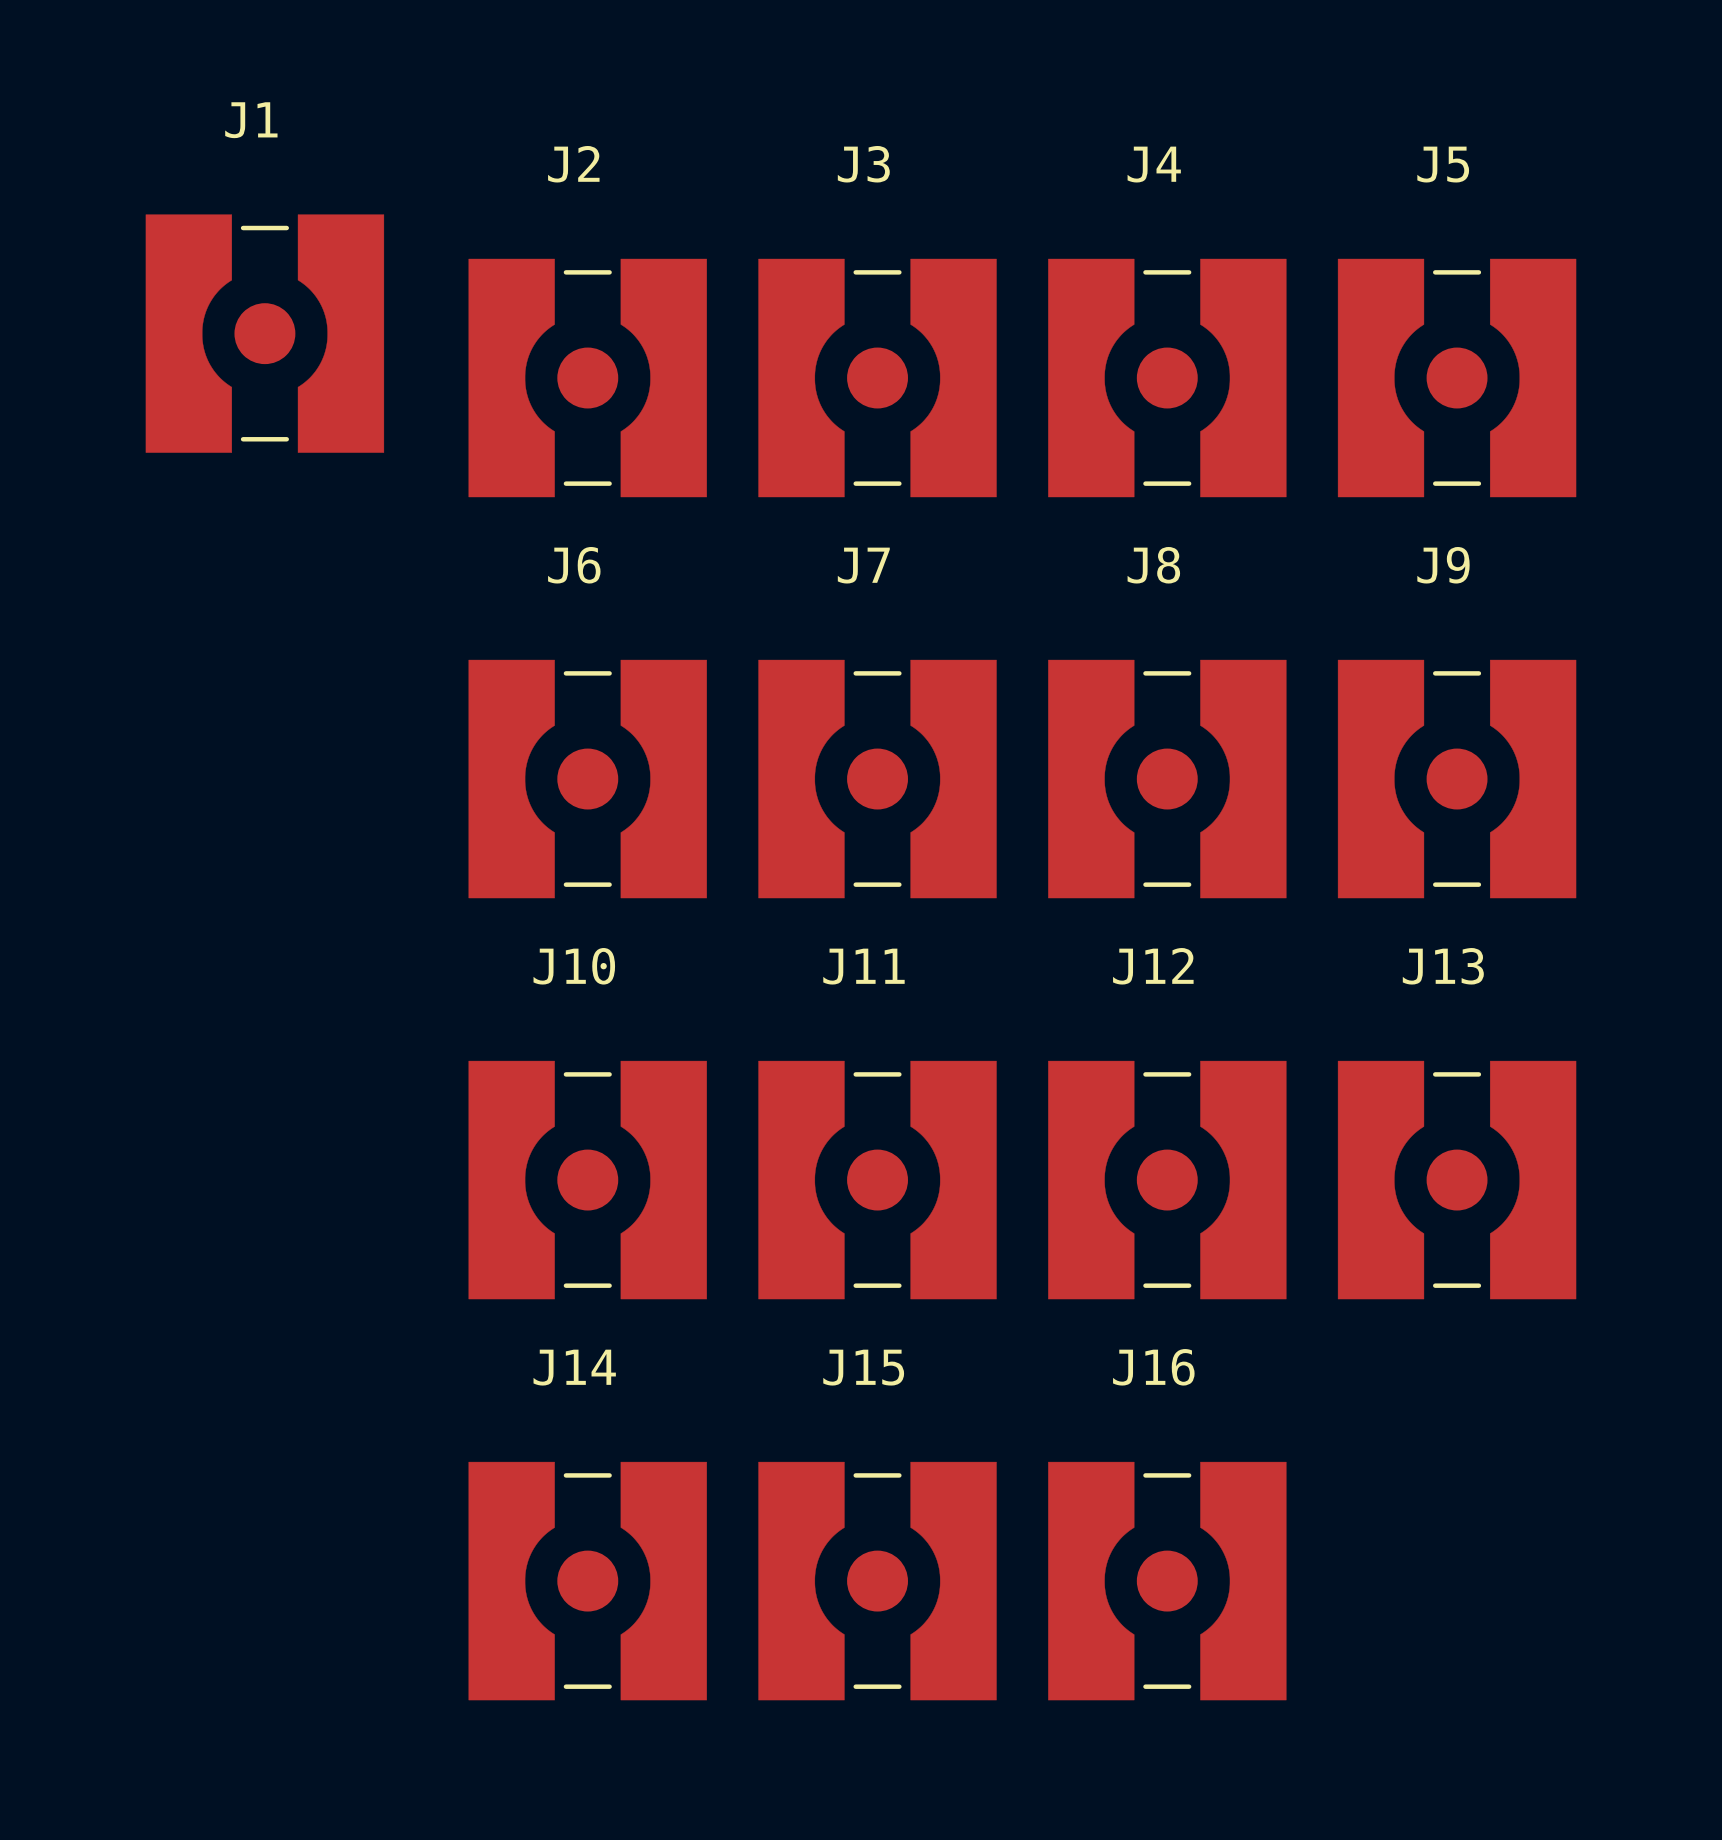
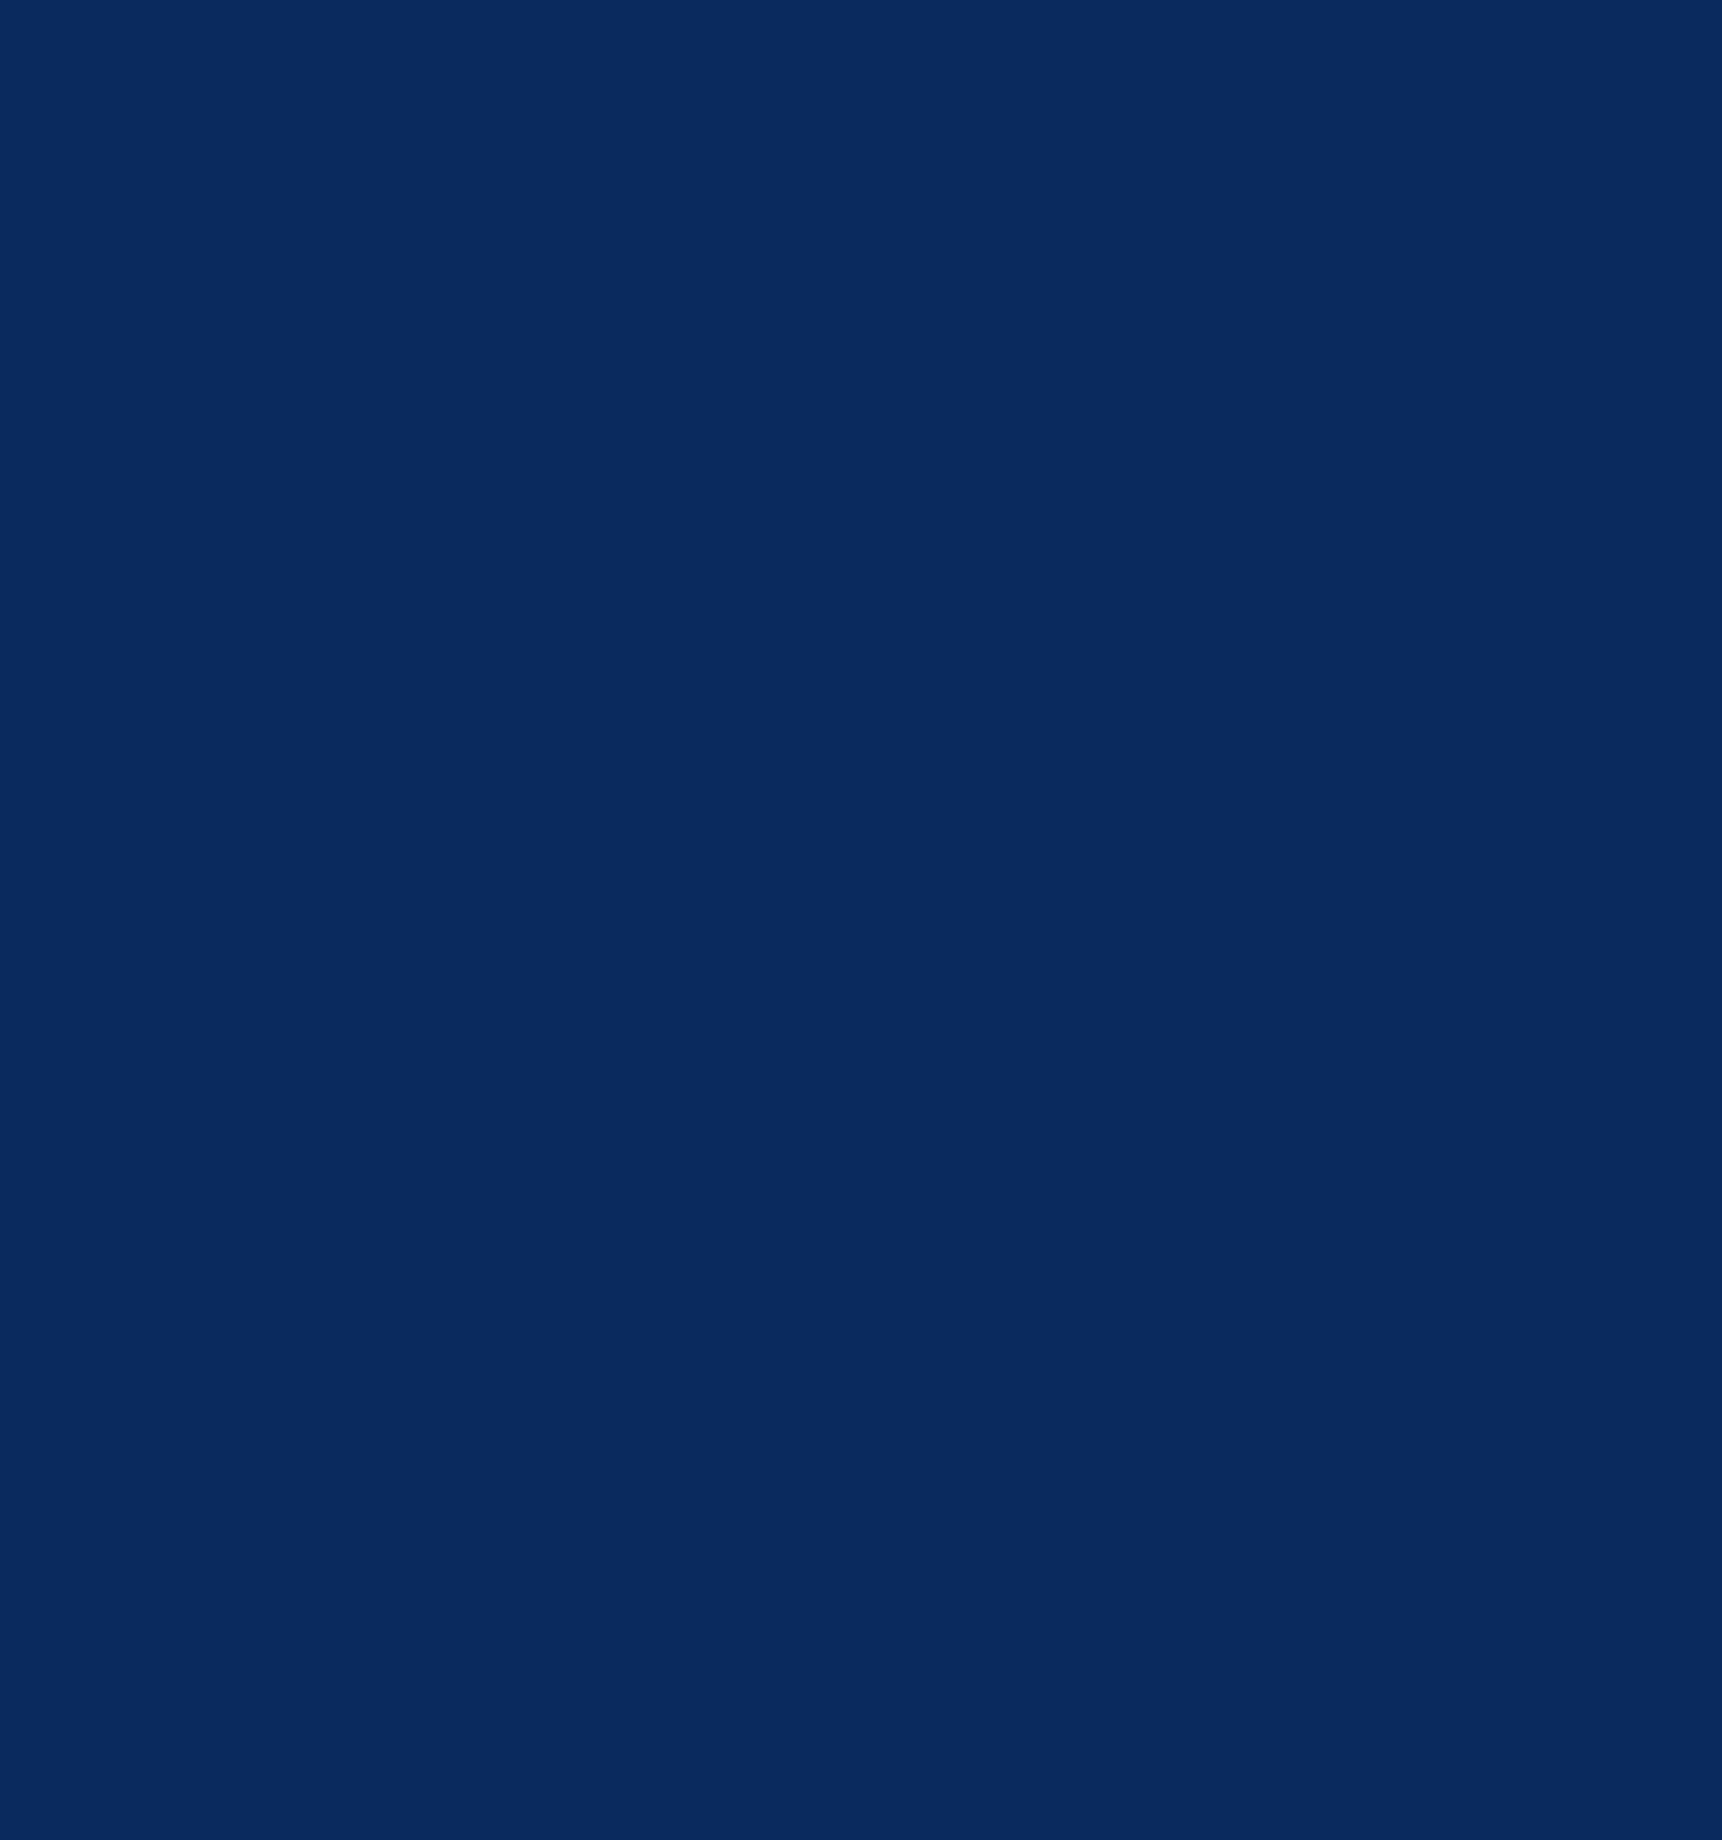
J1: (264, 333) -> none
J2: (587, 378) -> none
J3: (877, 378) -> none
J4: (1167, 378) -> none
J5: (1457, 378) -> none
J6: (587, 779) -> none
J7: (877, 779) -> none
J8: (1167, 779) -> none
J9: (1457, 779) -> none
J10: (587, 1180) -> none
J11: (877, 1180) -> none
J12: (1167, 1180) -> none
J13: (1457, 1180) -> none
J14: (587, 1581) -> none
J15: (877, 1581) -> none
J16: (1167, 1581) -> none

